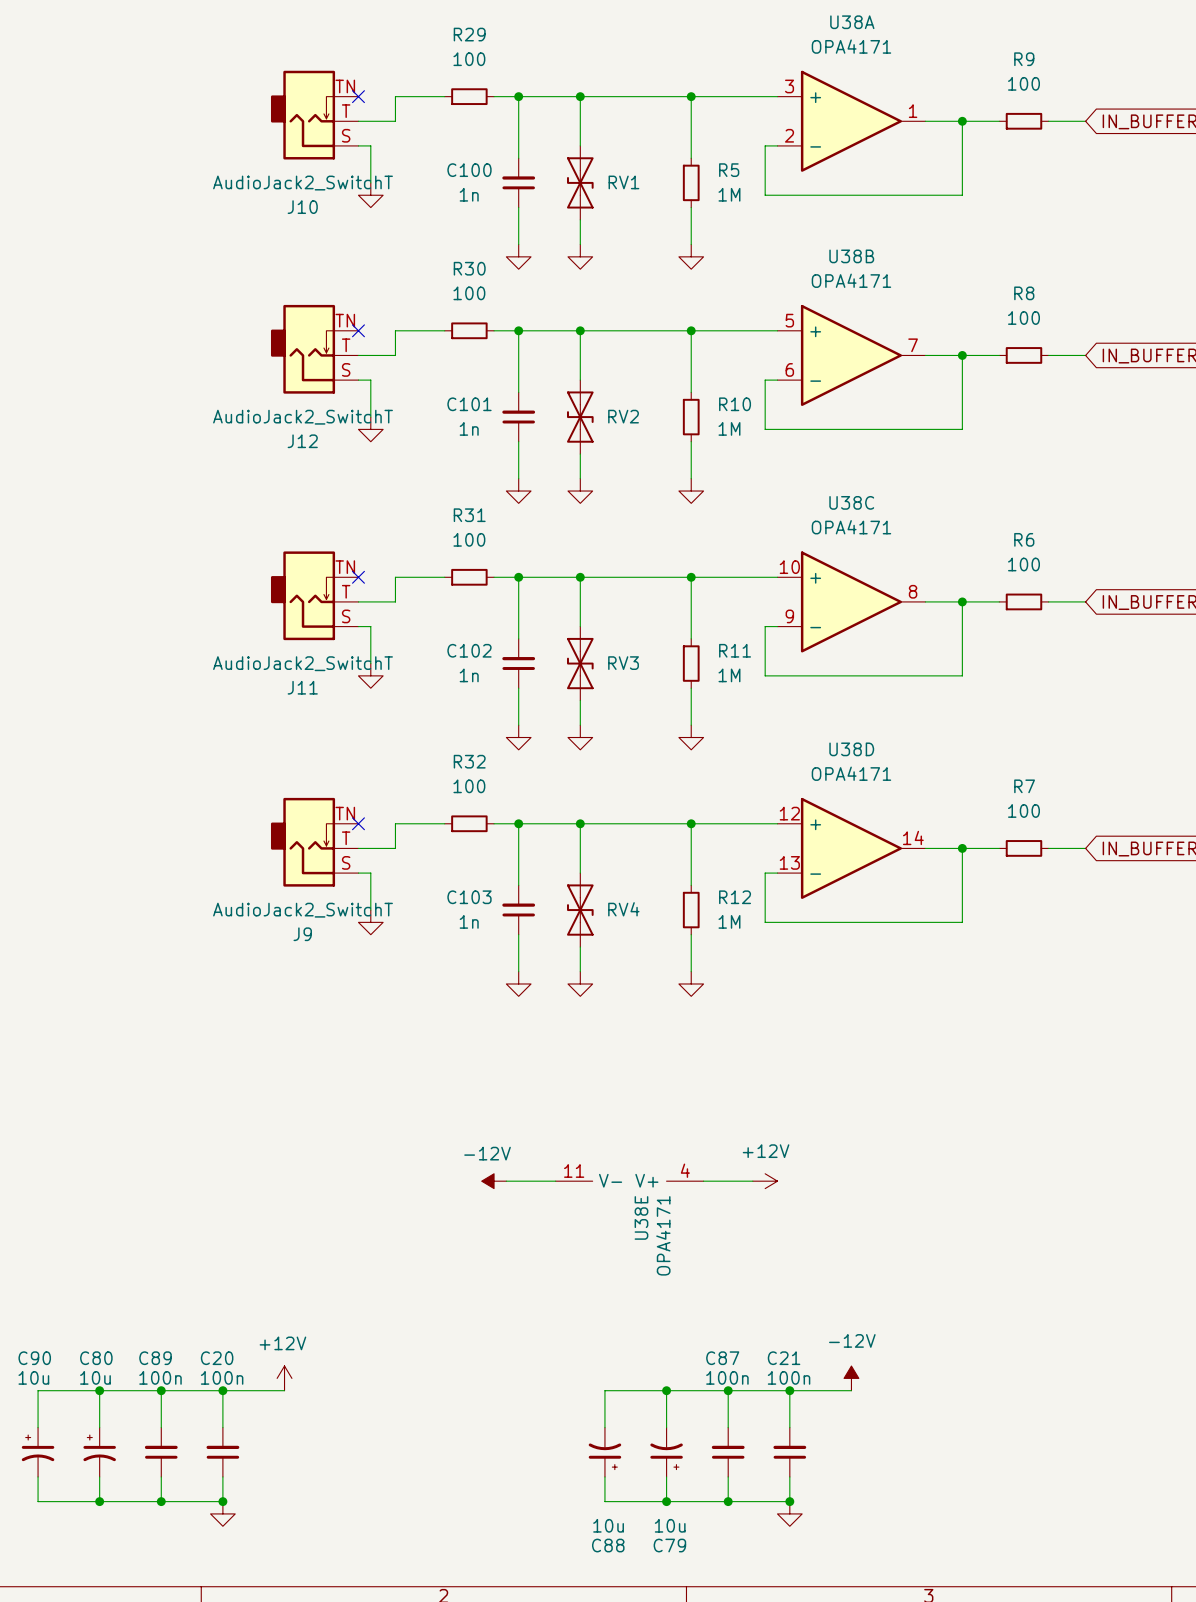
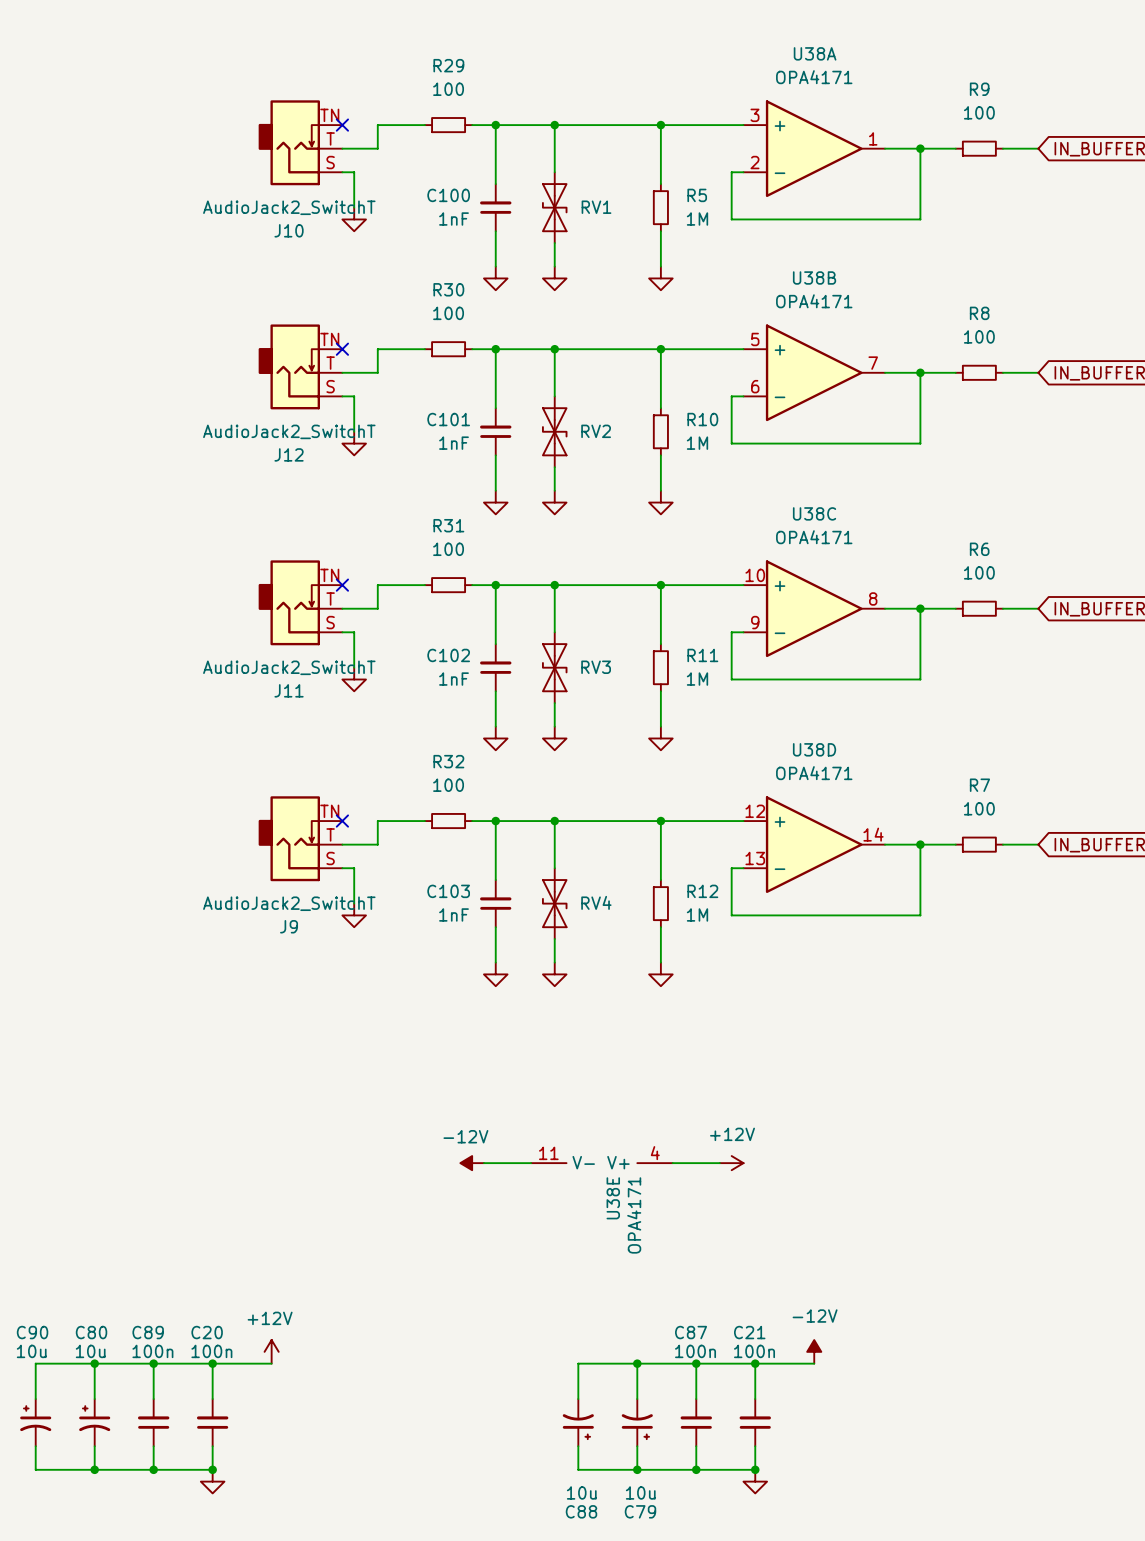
C100 value: 1n (469, 194) -> 1nF (453, 219)
C101 value: 1n (469, 428) -> 1nF (453, 443)
C102 value: 1n (469, 675) -> 1nF (453, 679)
C103 value: 1n (469, 921) -> 1nF (453, 914)

